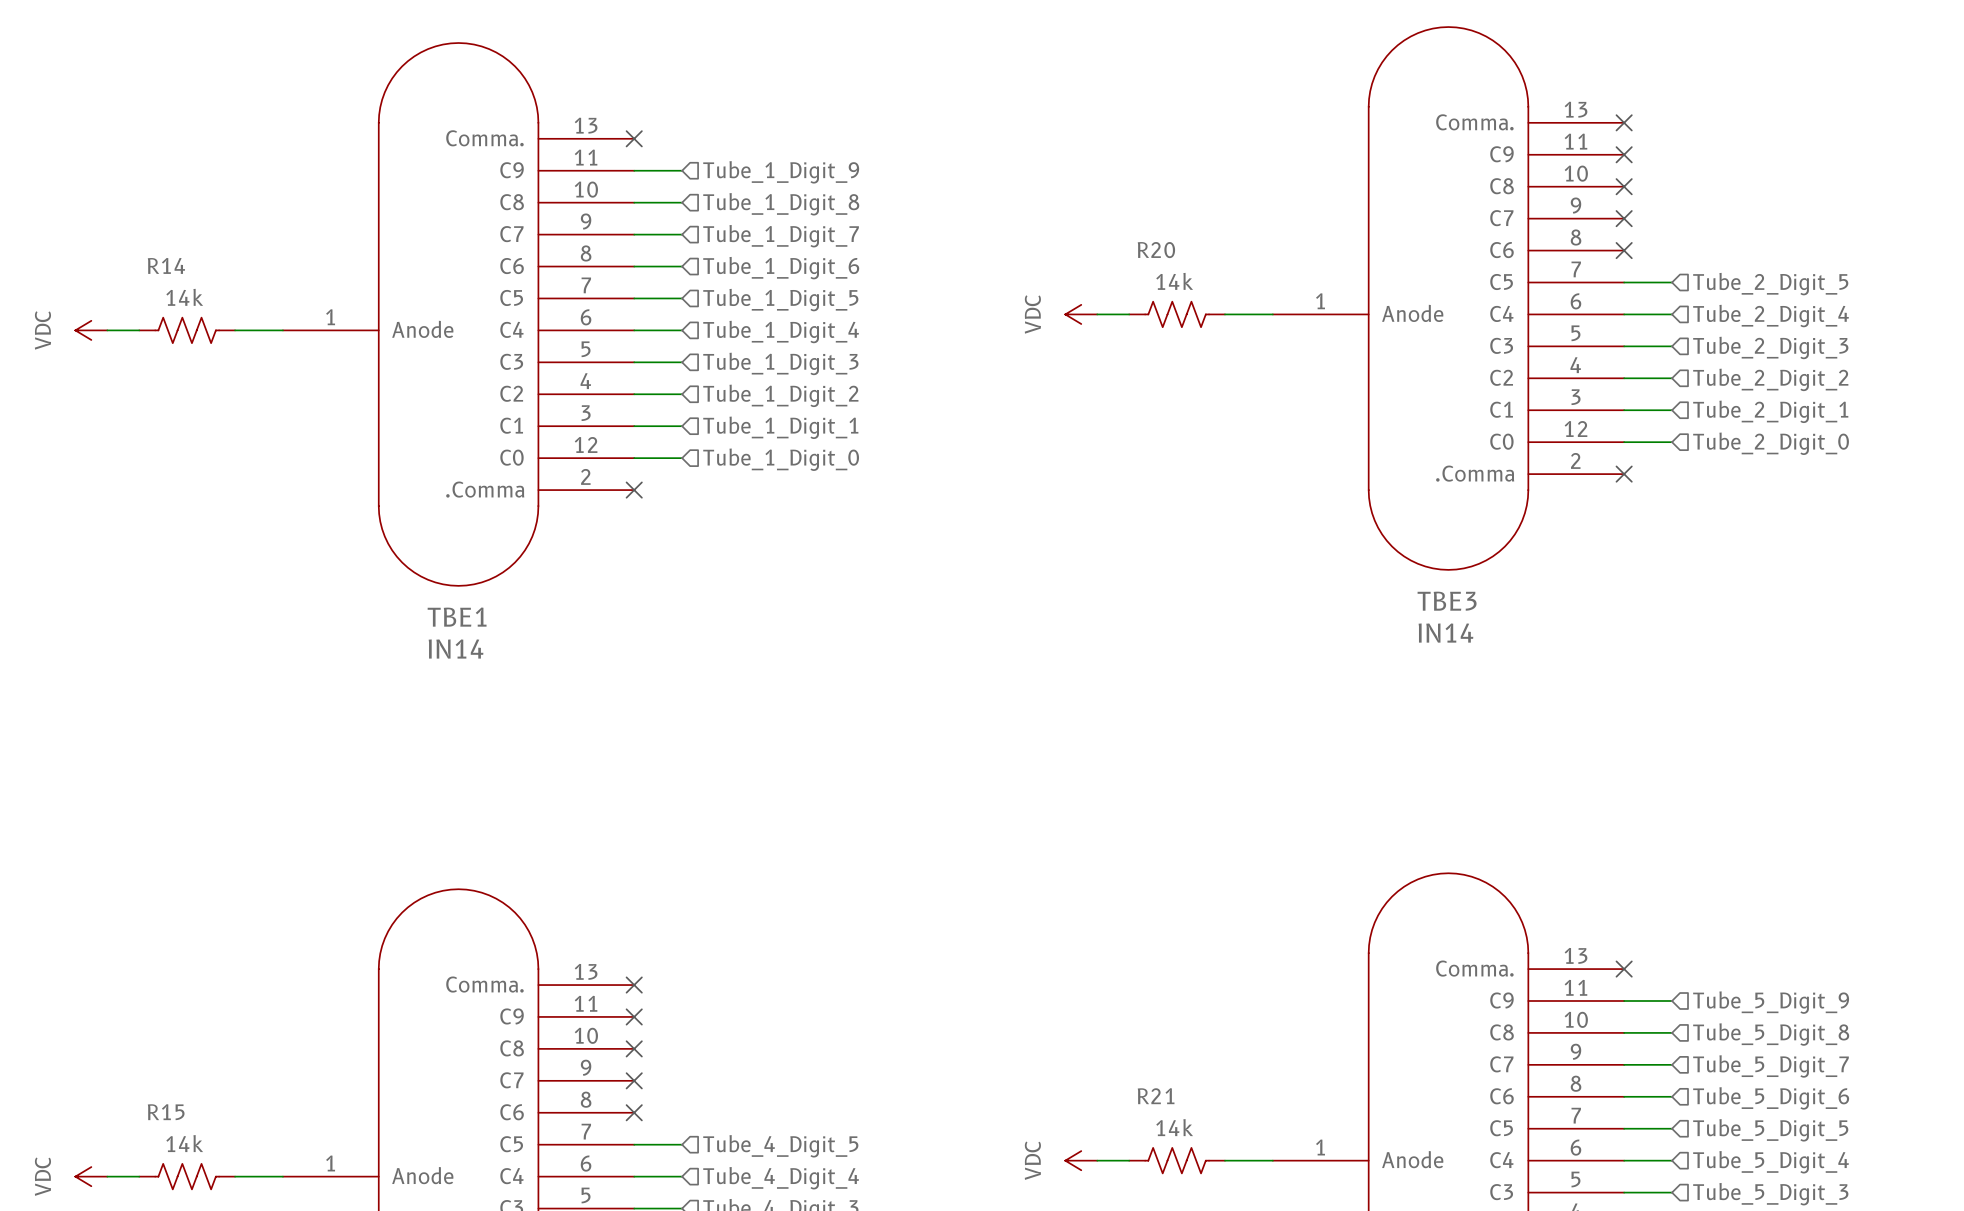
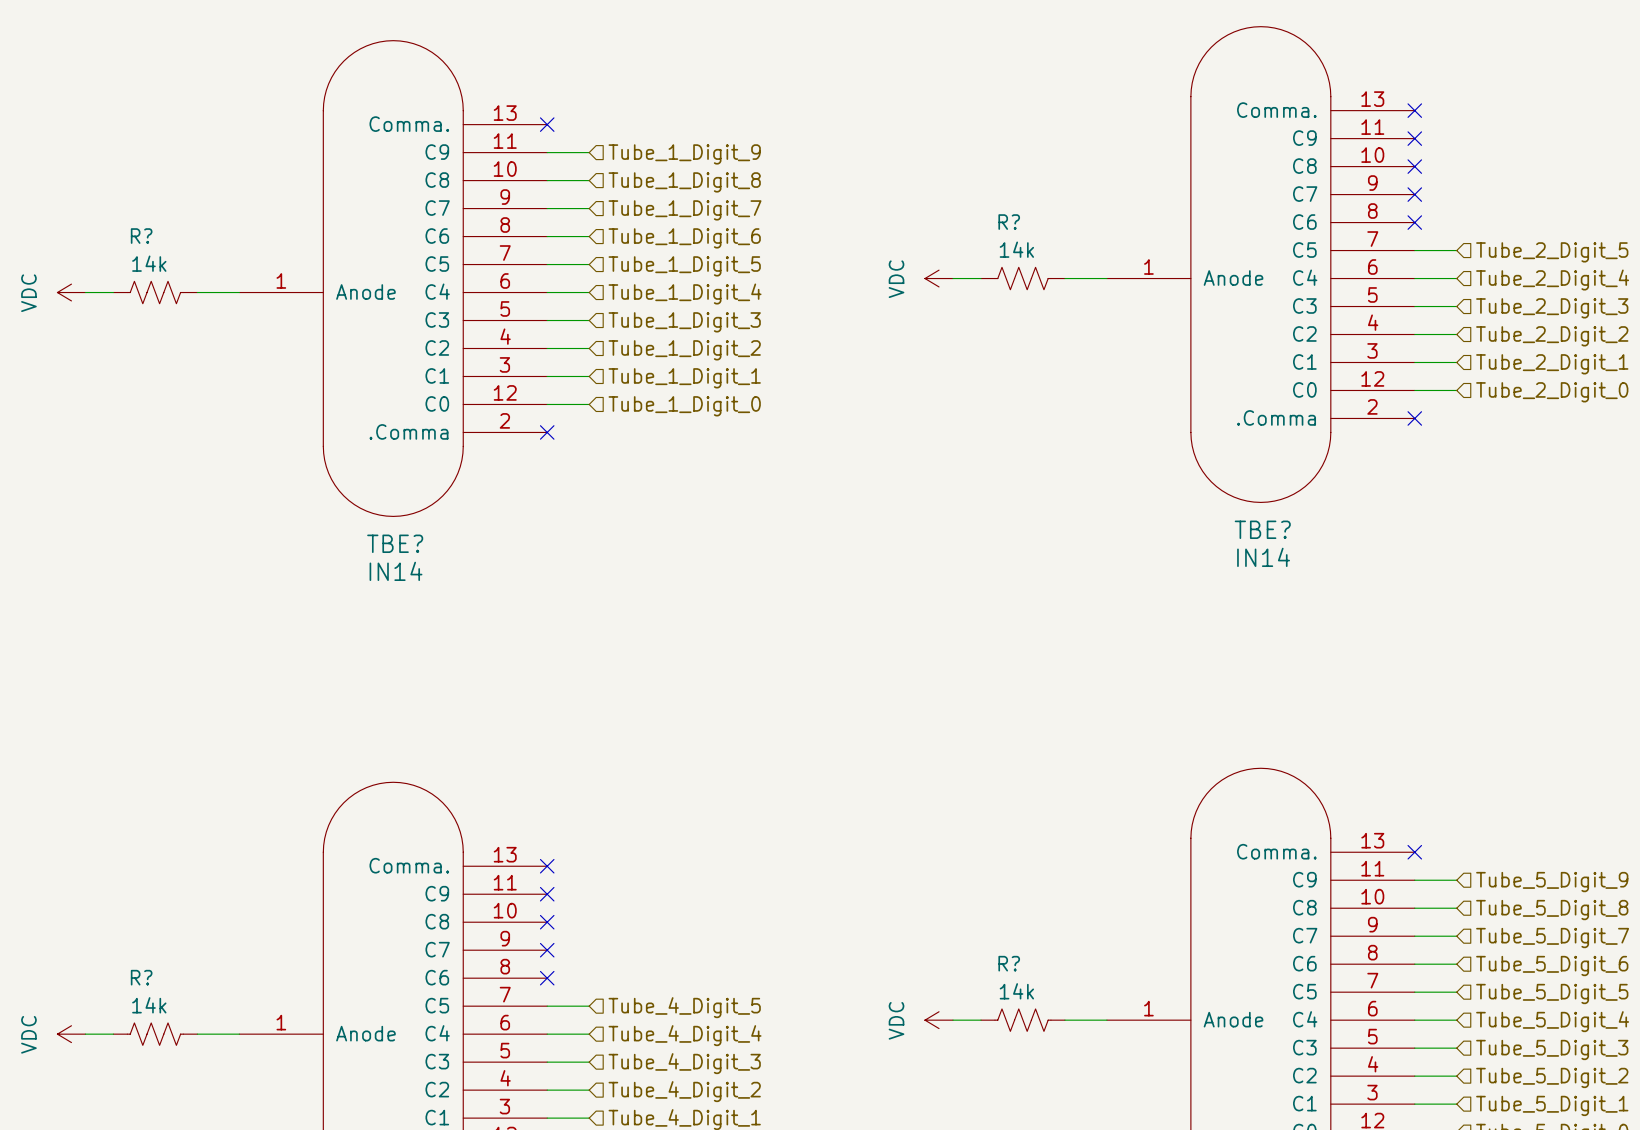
R20 name: R20 (1156, 250) -> R? (1009, 222)
R14 name: R14 (166, 265) -> R? (141, 236)
TBE3 name: TBE3 (1447, 601) -> TBE? (1262, 529)
TBE1 name: TBE1 (457, 617) -> TBE? (395, 543)
R21 name: R21 (1156, 1096) -> R? (1009, 963)
R15 name: R15 (166, 1112) -> R? (141, 977)

